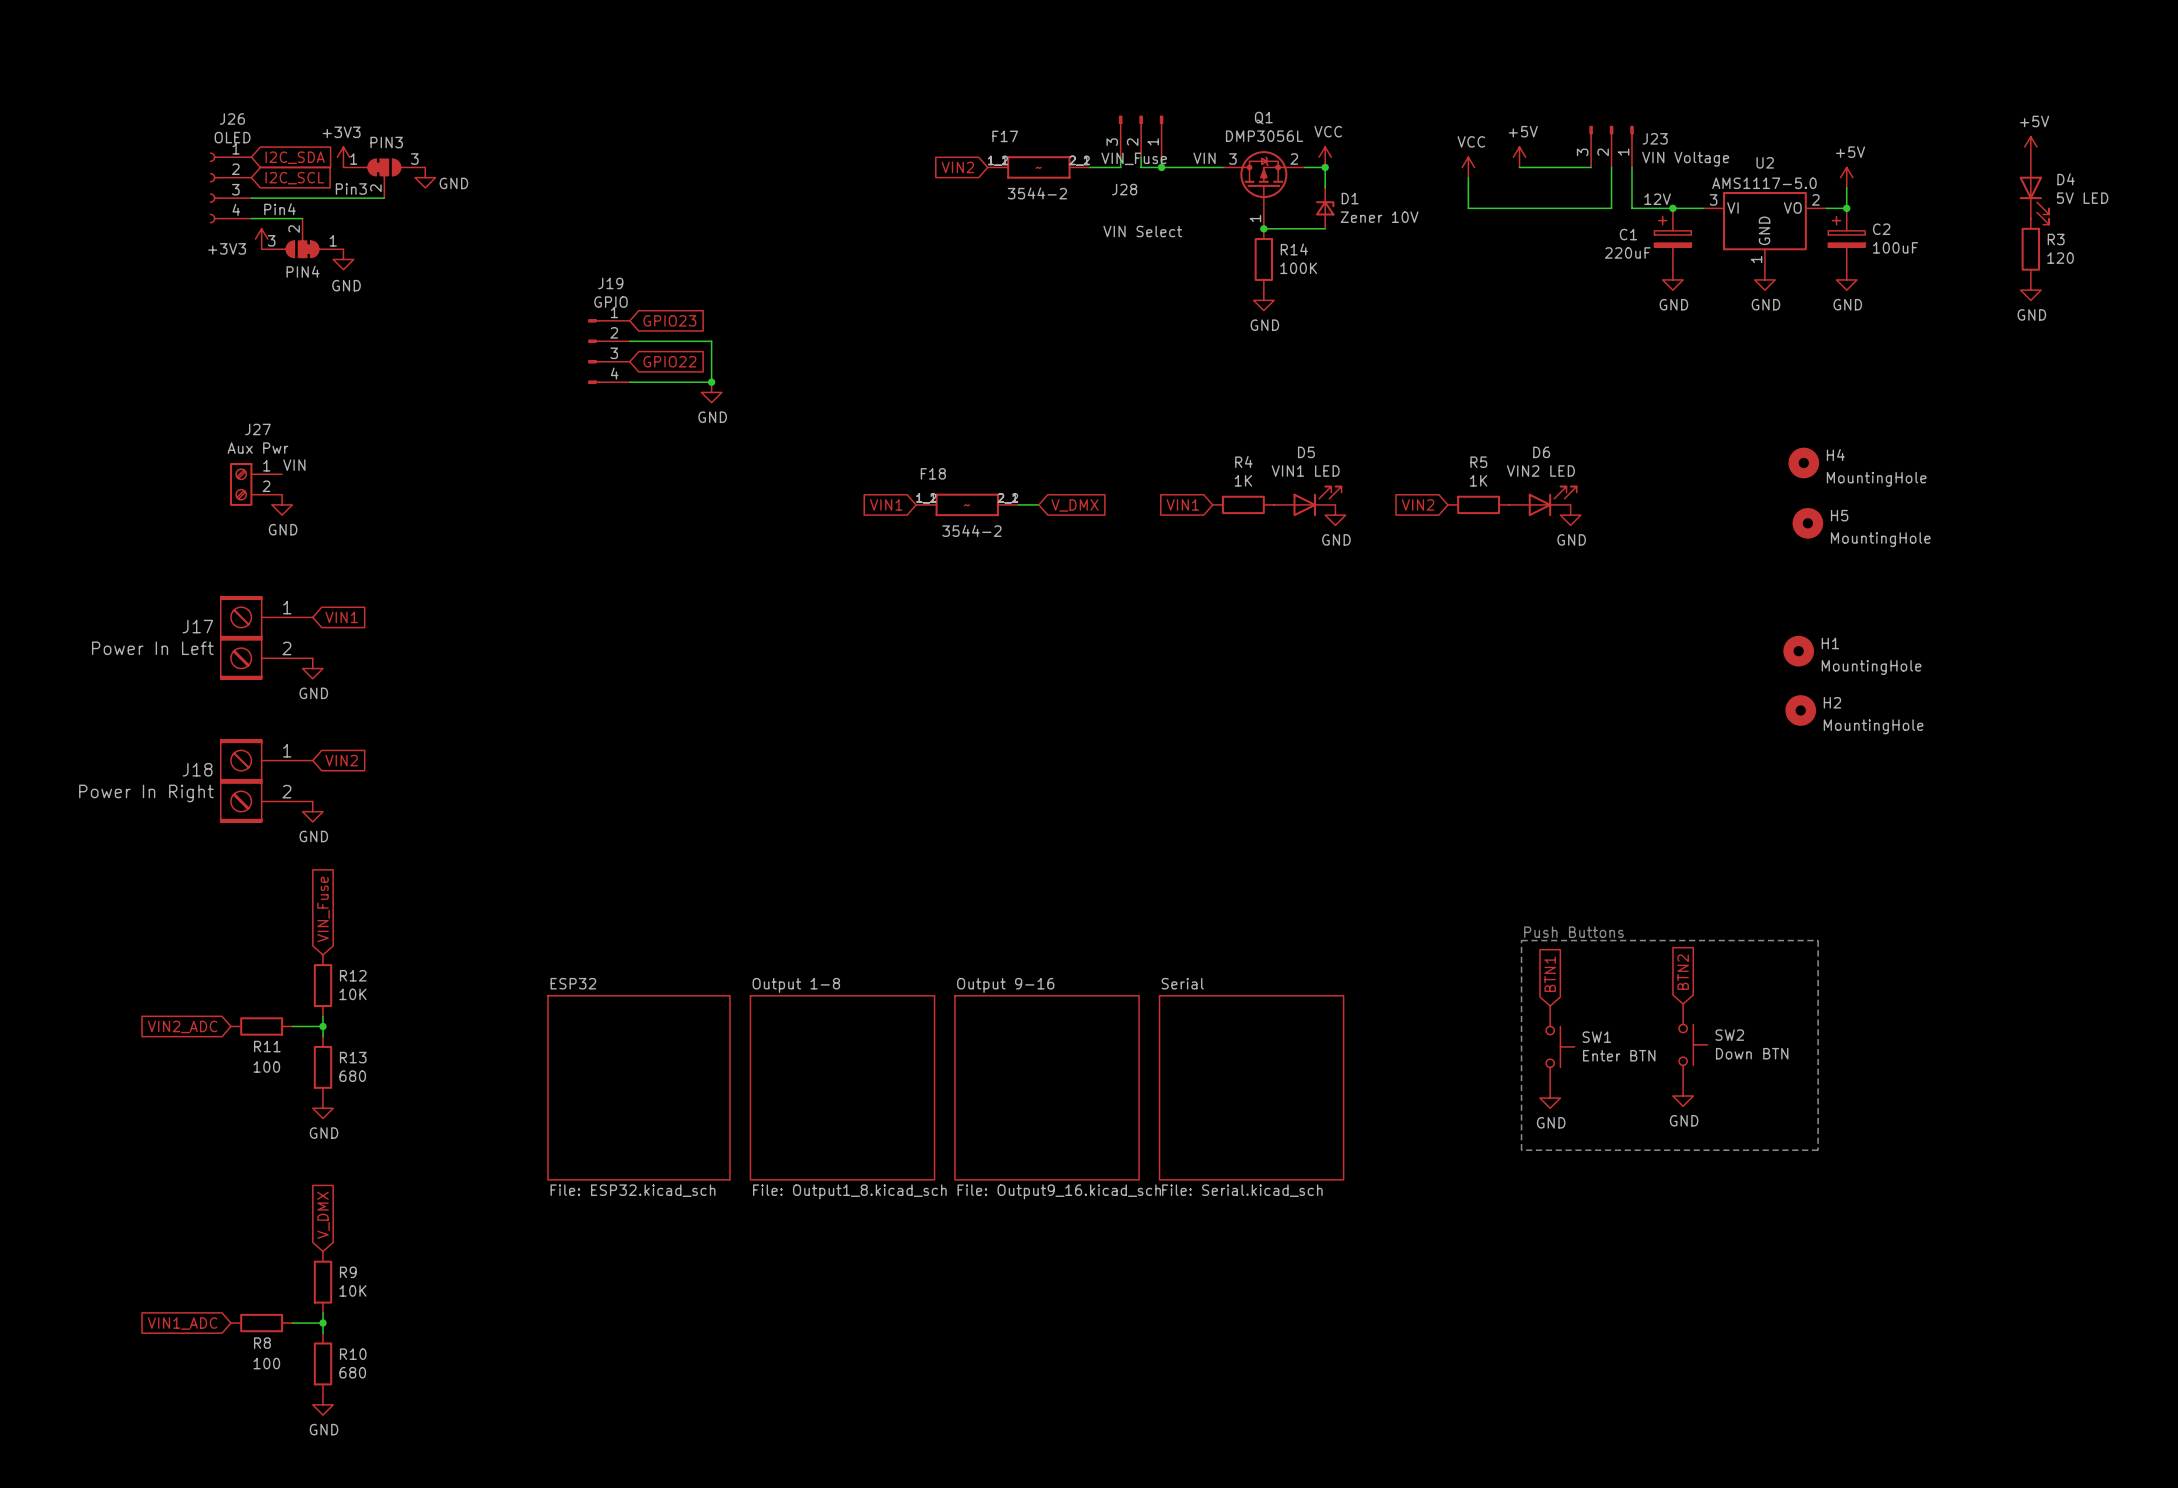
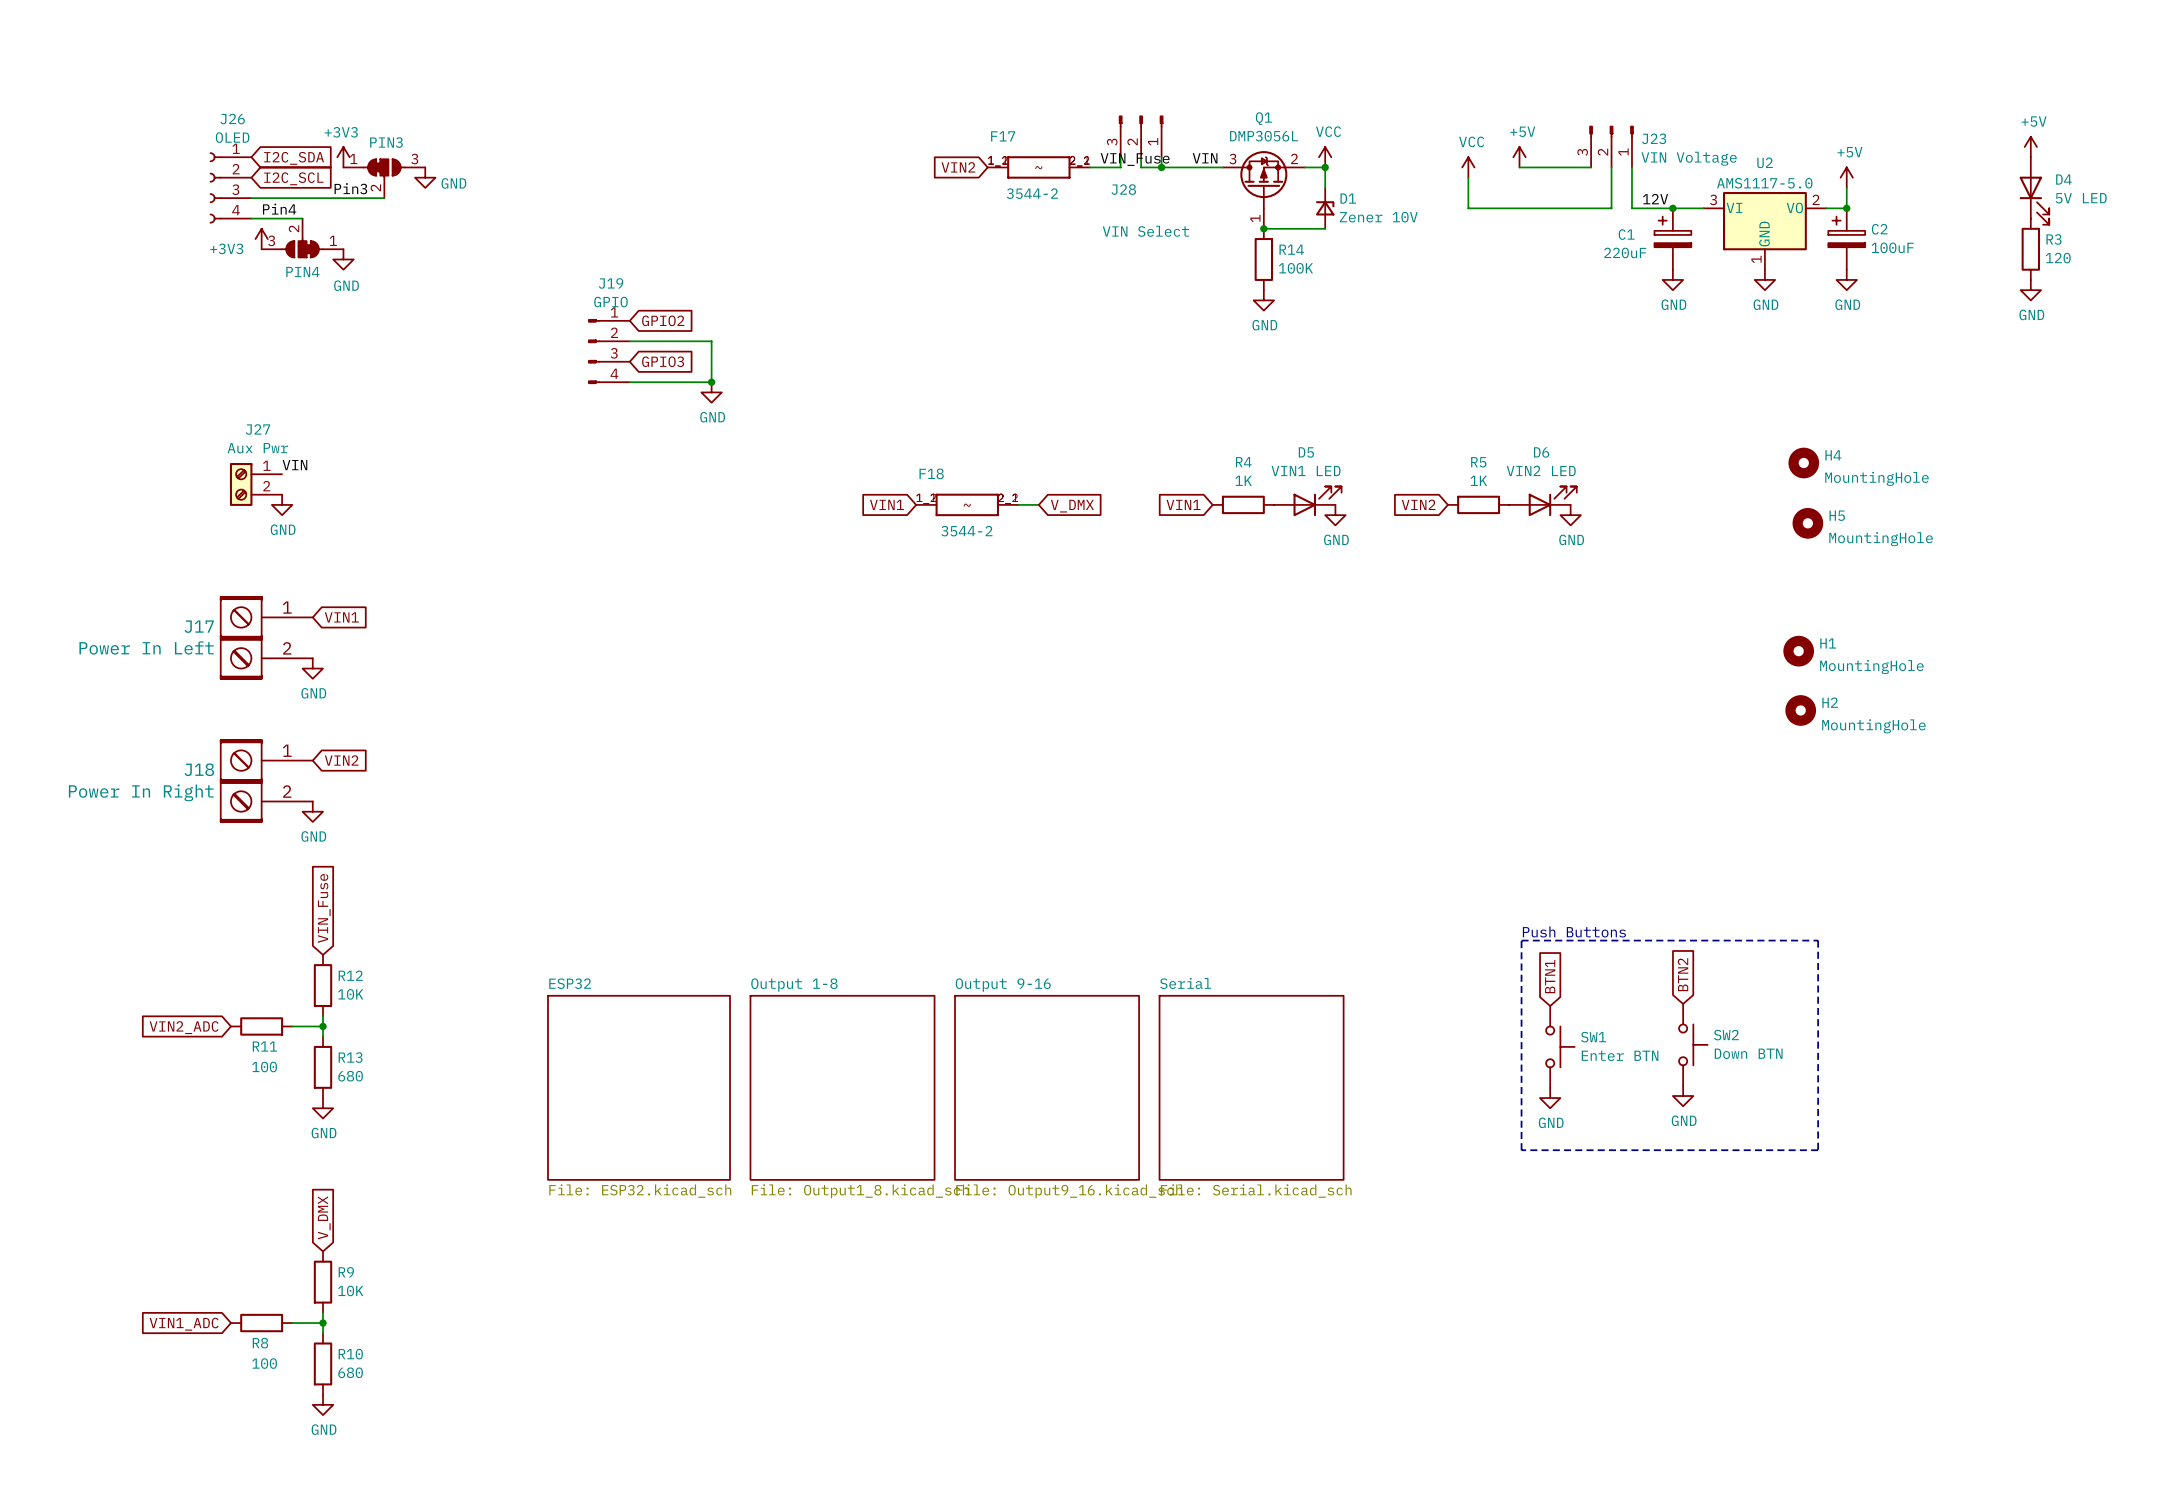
global label: GPIO23 (669, 320) -> GPIO2 (663, 320)
global label: GPIO22 (669, 361) -> GPIO3 (663, 361)

